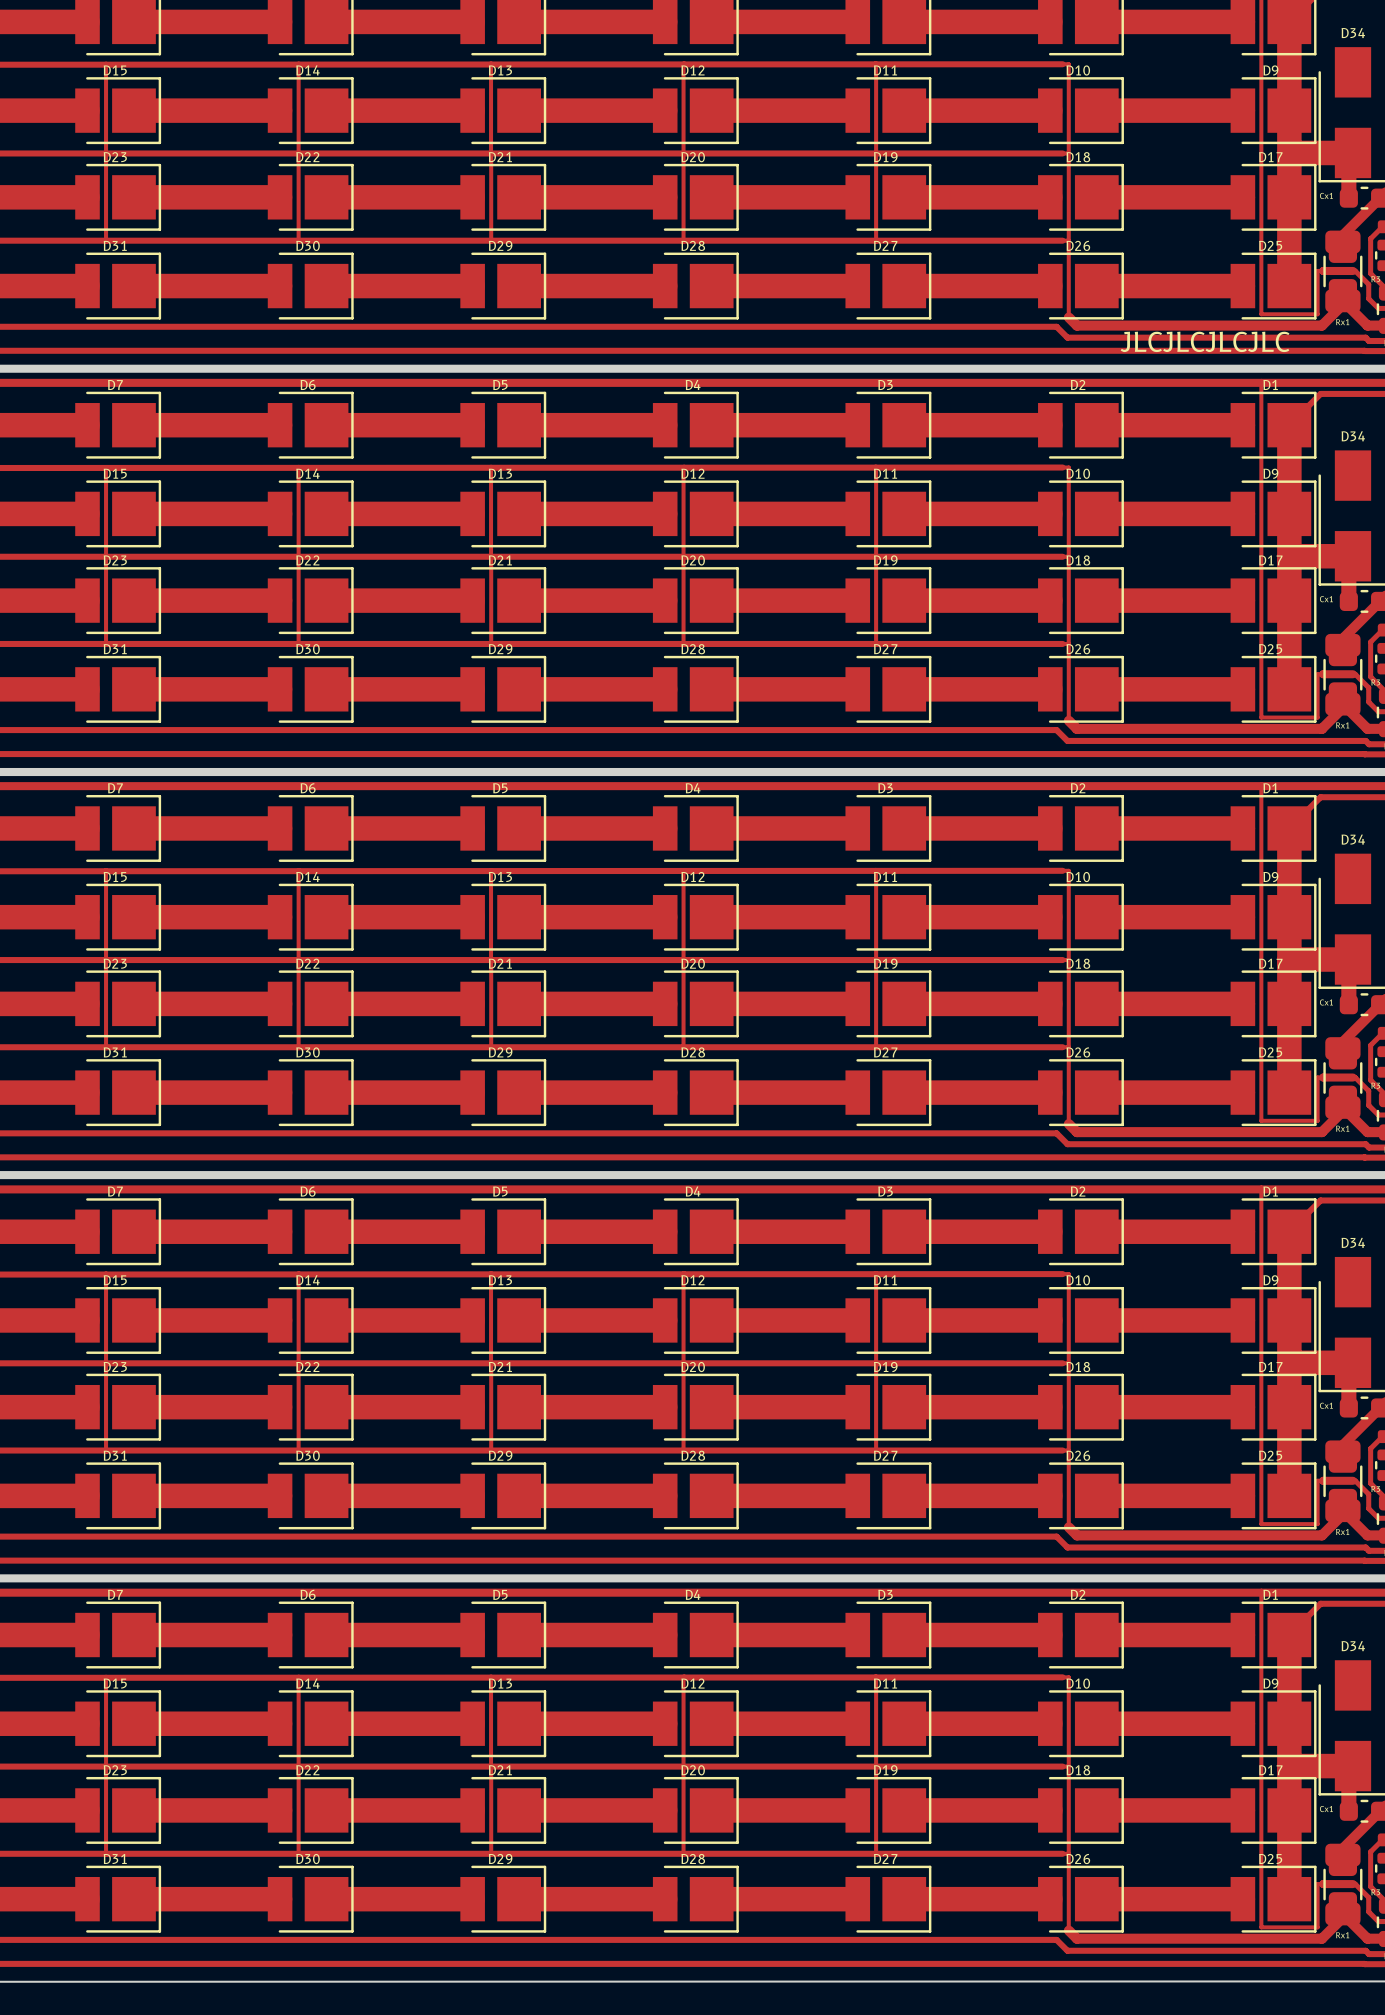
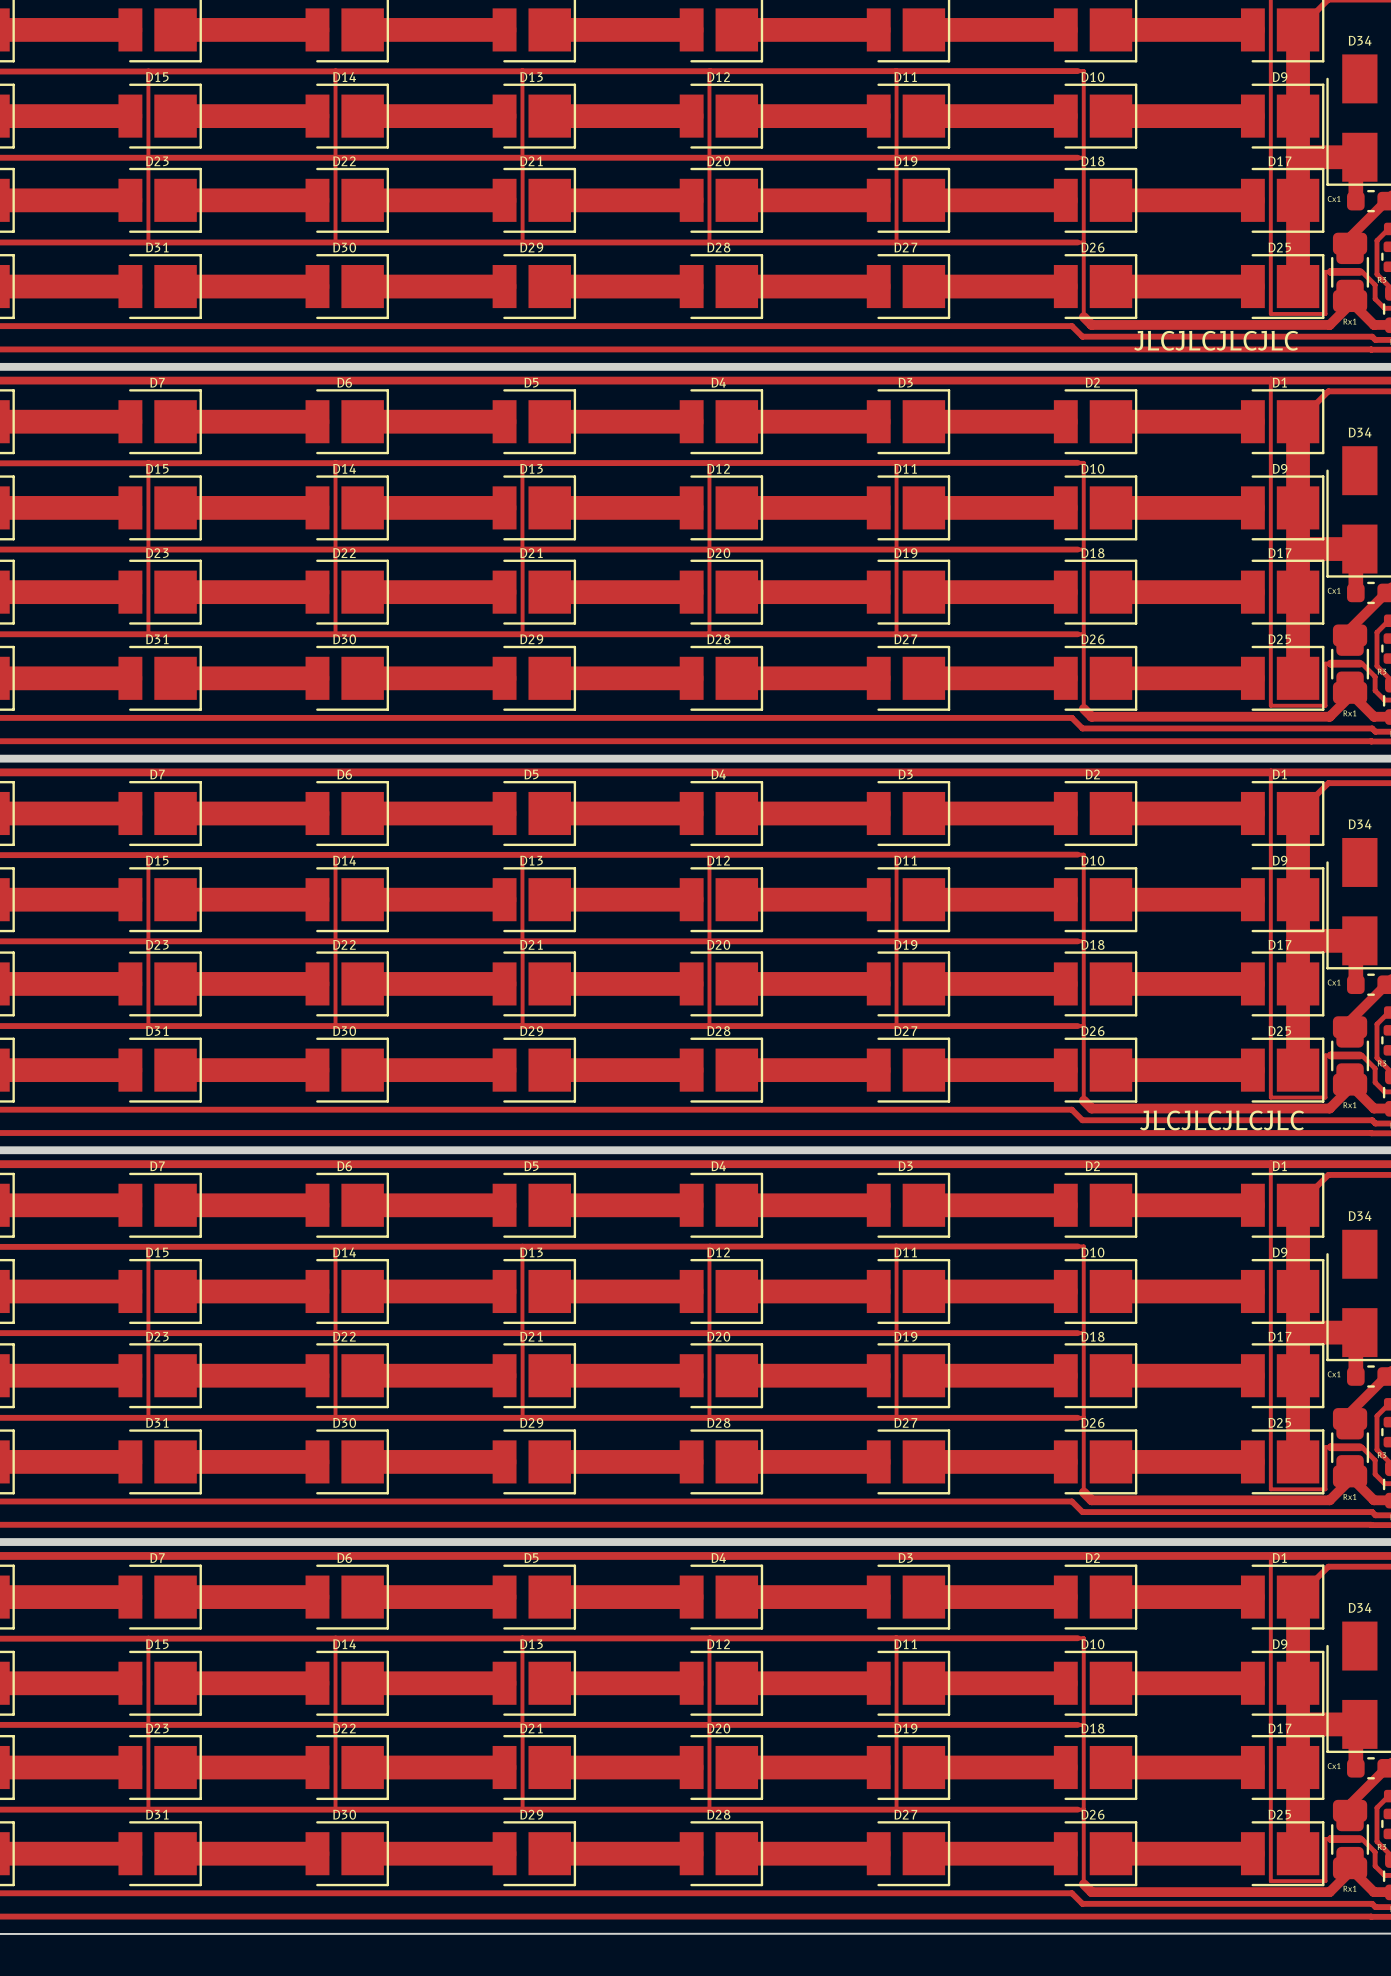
text: none -> JLCJLCJLCJLC (1222, 1120)

